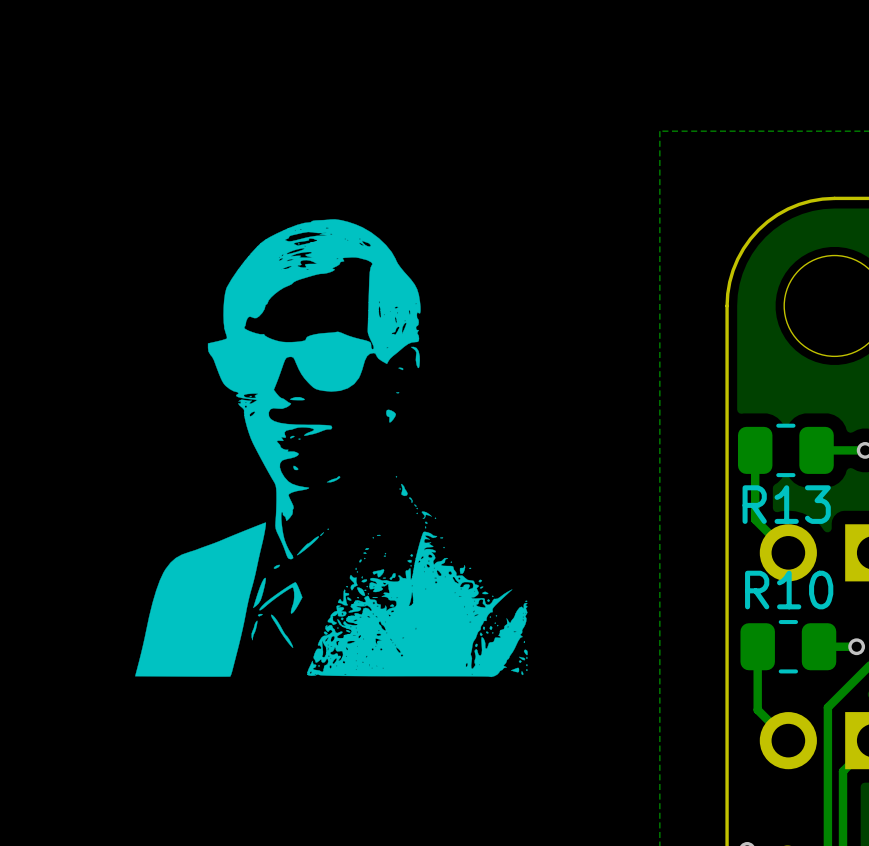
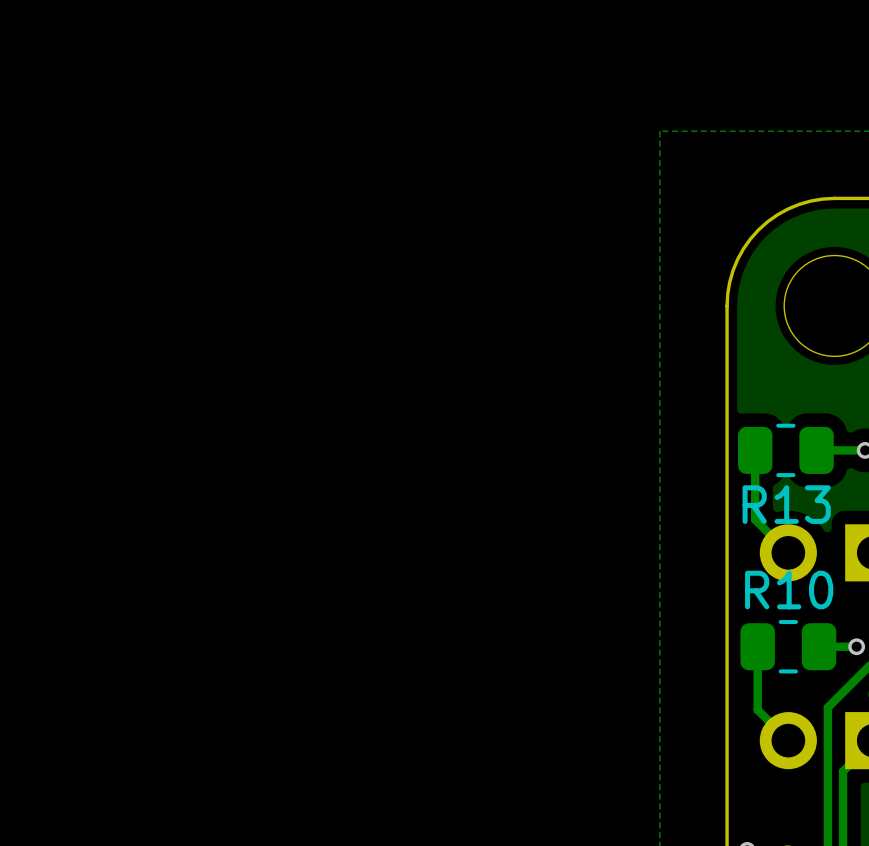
drawing: [135, 219, 528, 678] -> none

